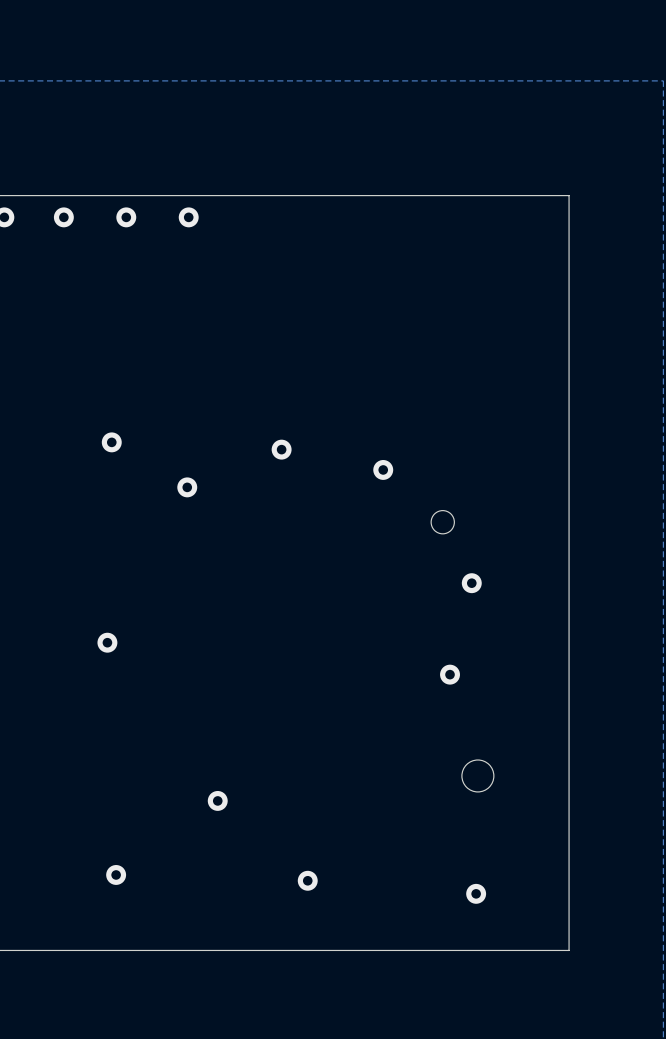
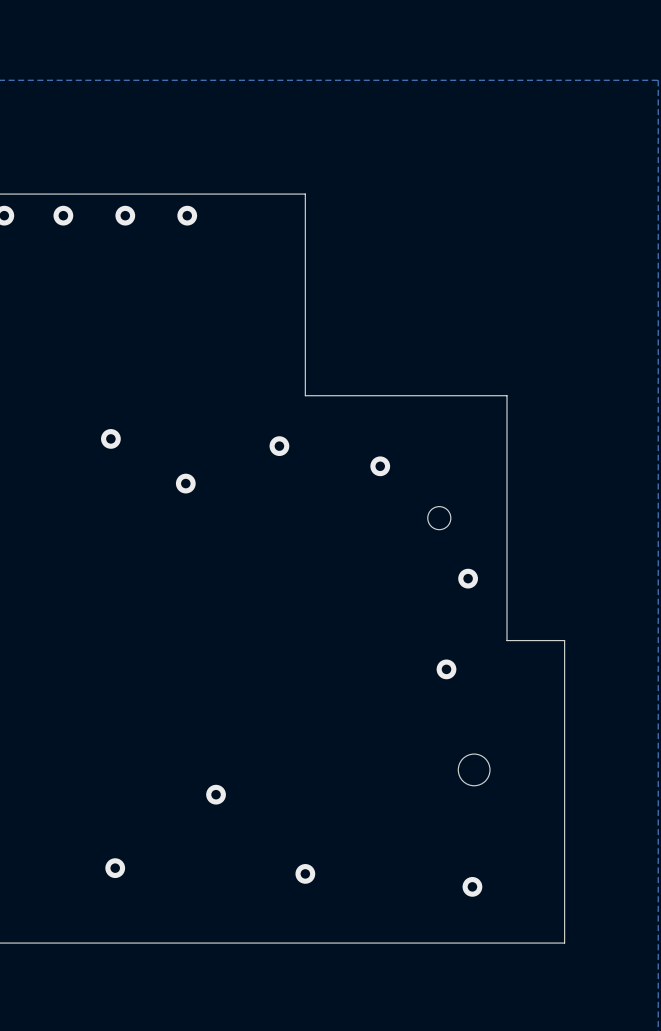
board edge: (307, 195) (569, 195) (569, 645) -> (305, 194) (305, 395) (506, 395) (506, 640) (564, 640)
via: (107, 642) -> none

